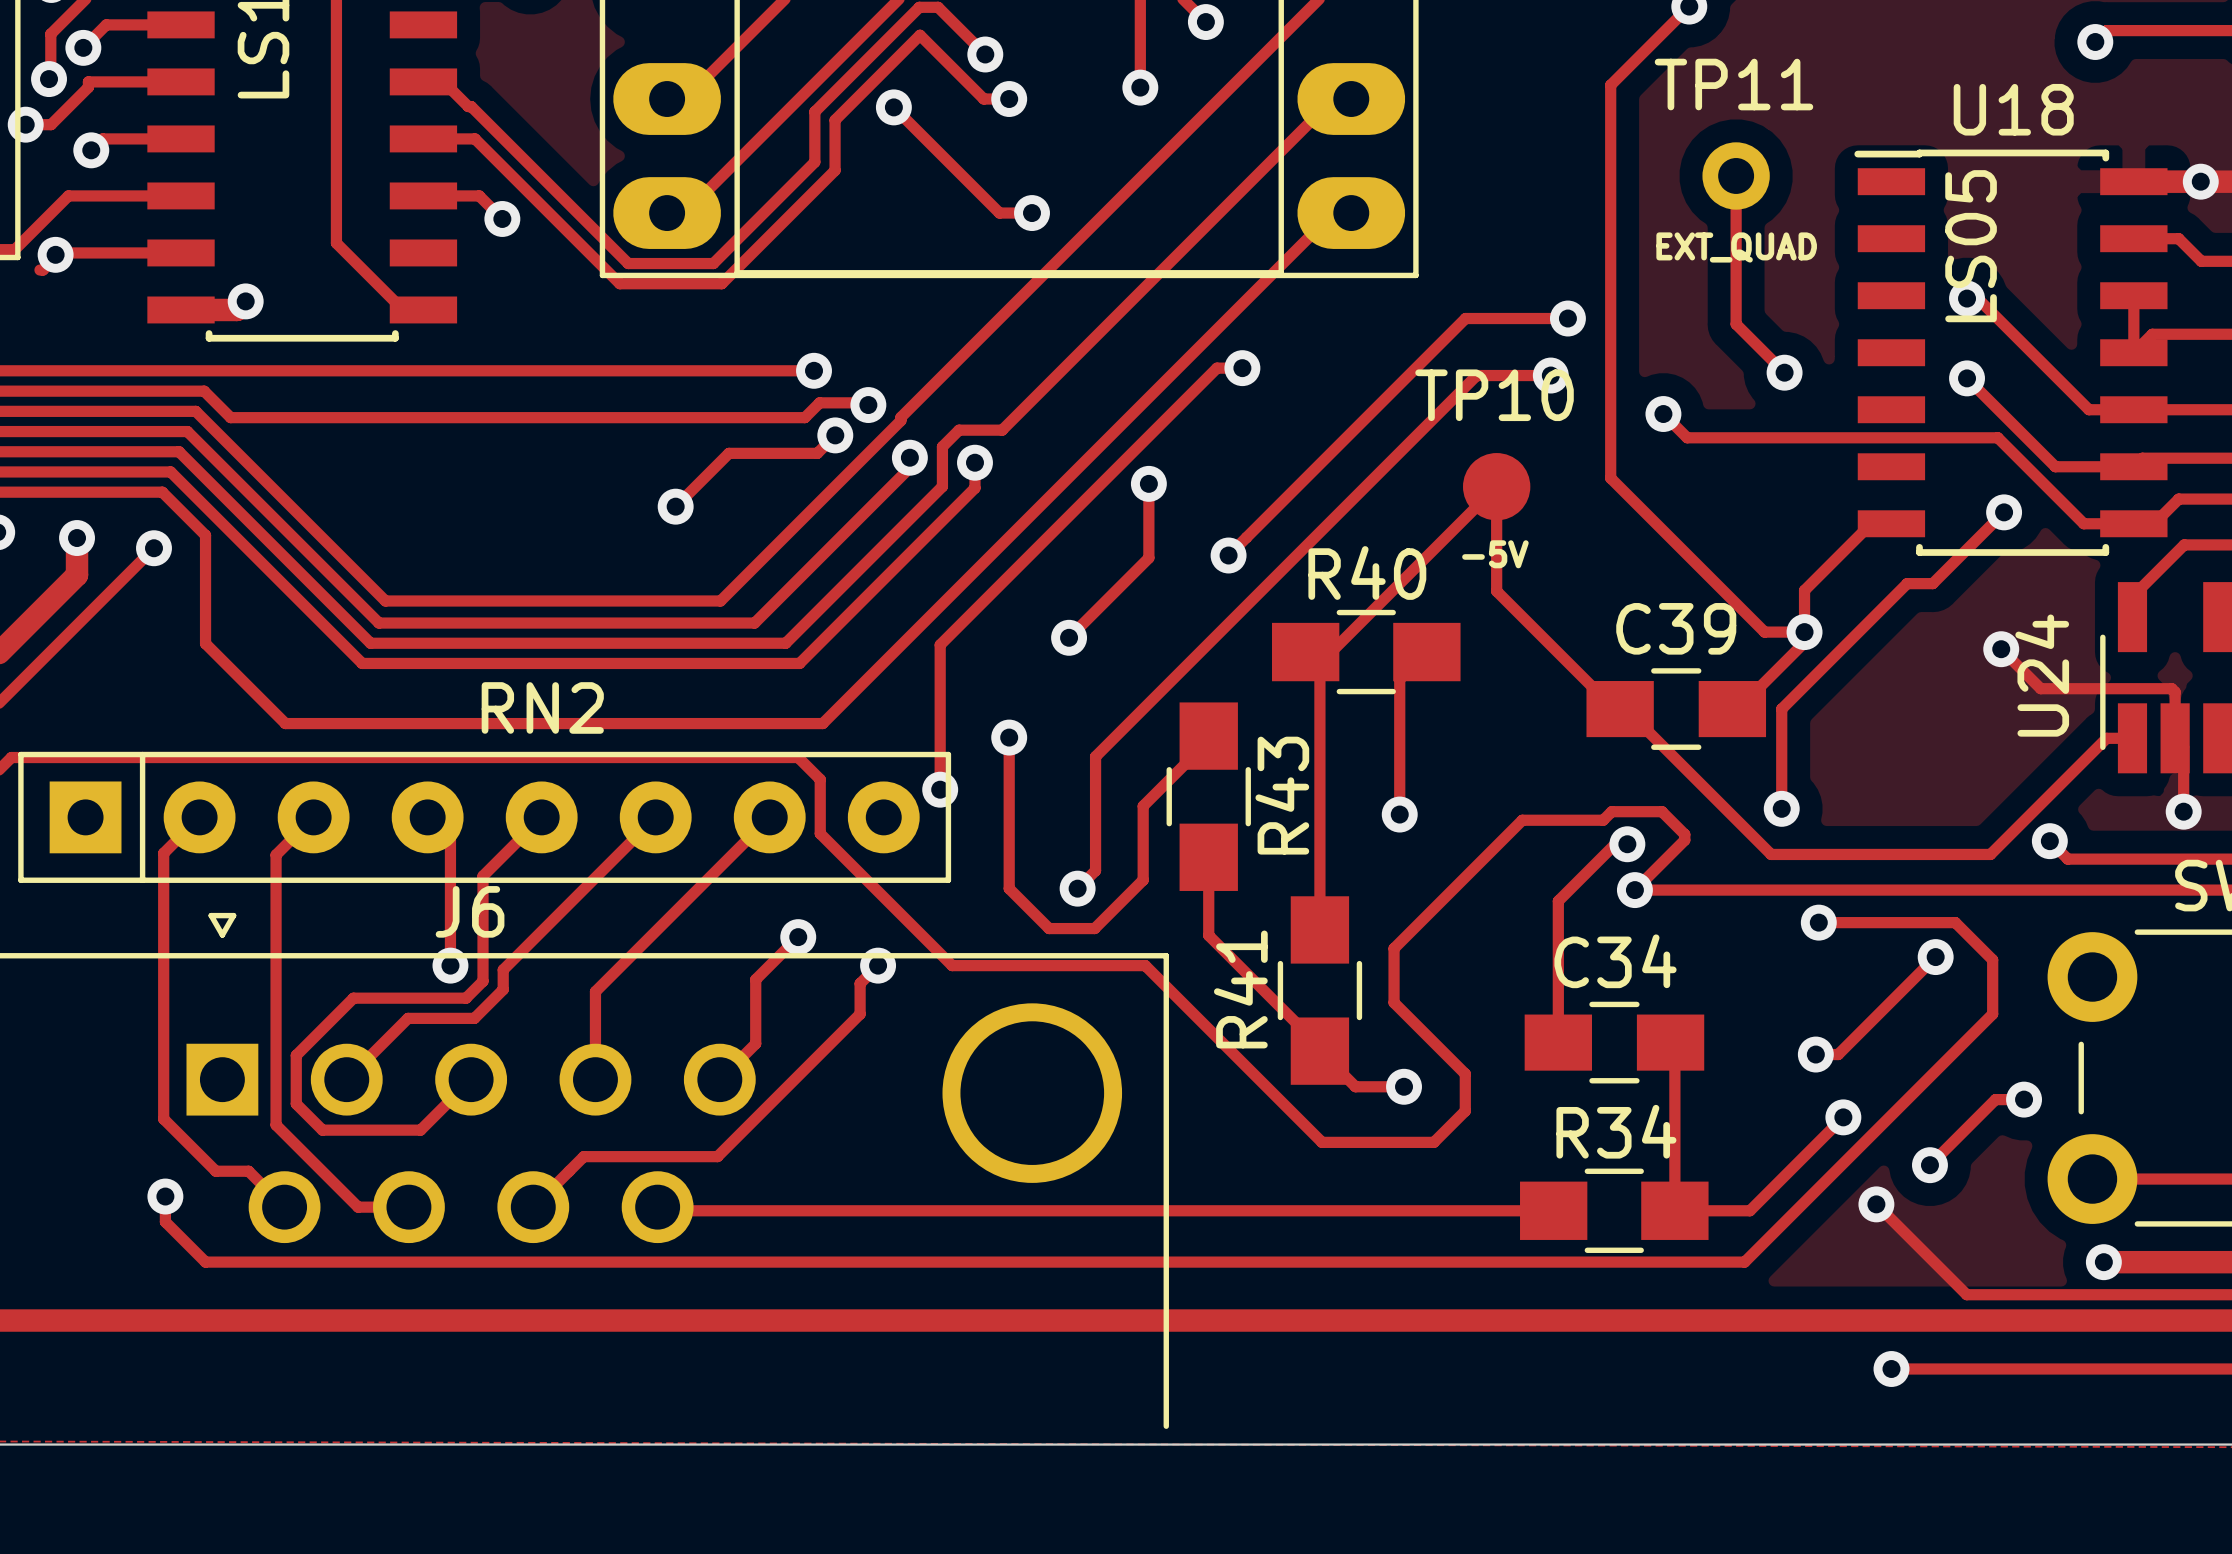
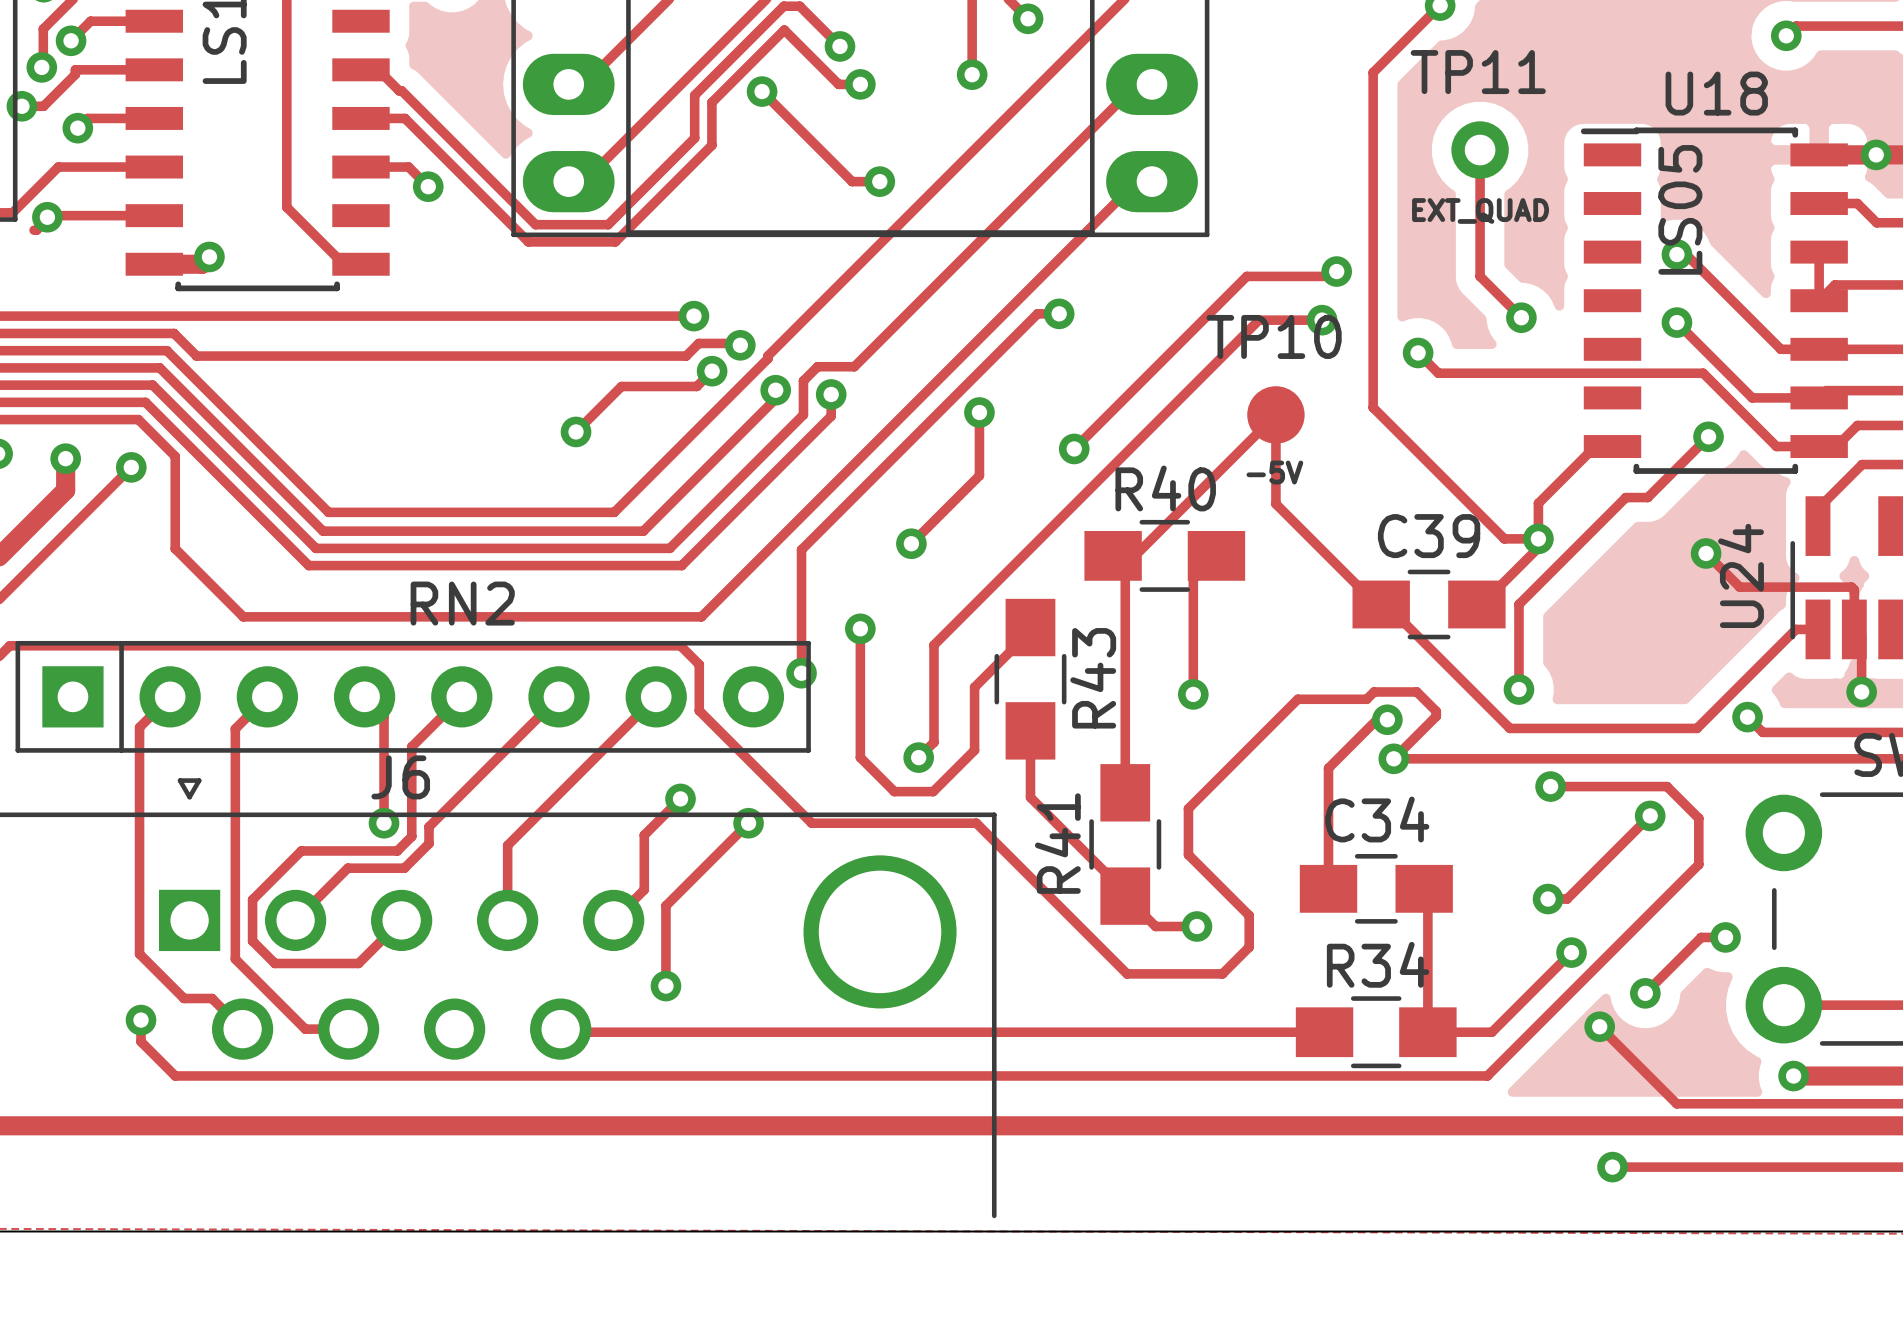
track: (1567, 318) (1465, 318) (1228, 555) -> (1336, 271) (1331, 276) (1246, 276) (1074, 448)
via position: (1228, 555) -> (1074, 448)
track: (860, 983) (860, 1014) (717, 1156) (583, 1156) (533, 1207) -> (733, 838) (665, 905) (665, 986)
via: none -> (665, 986)

